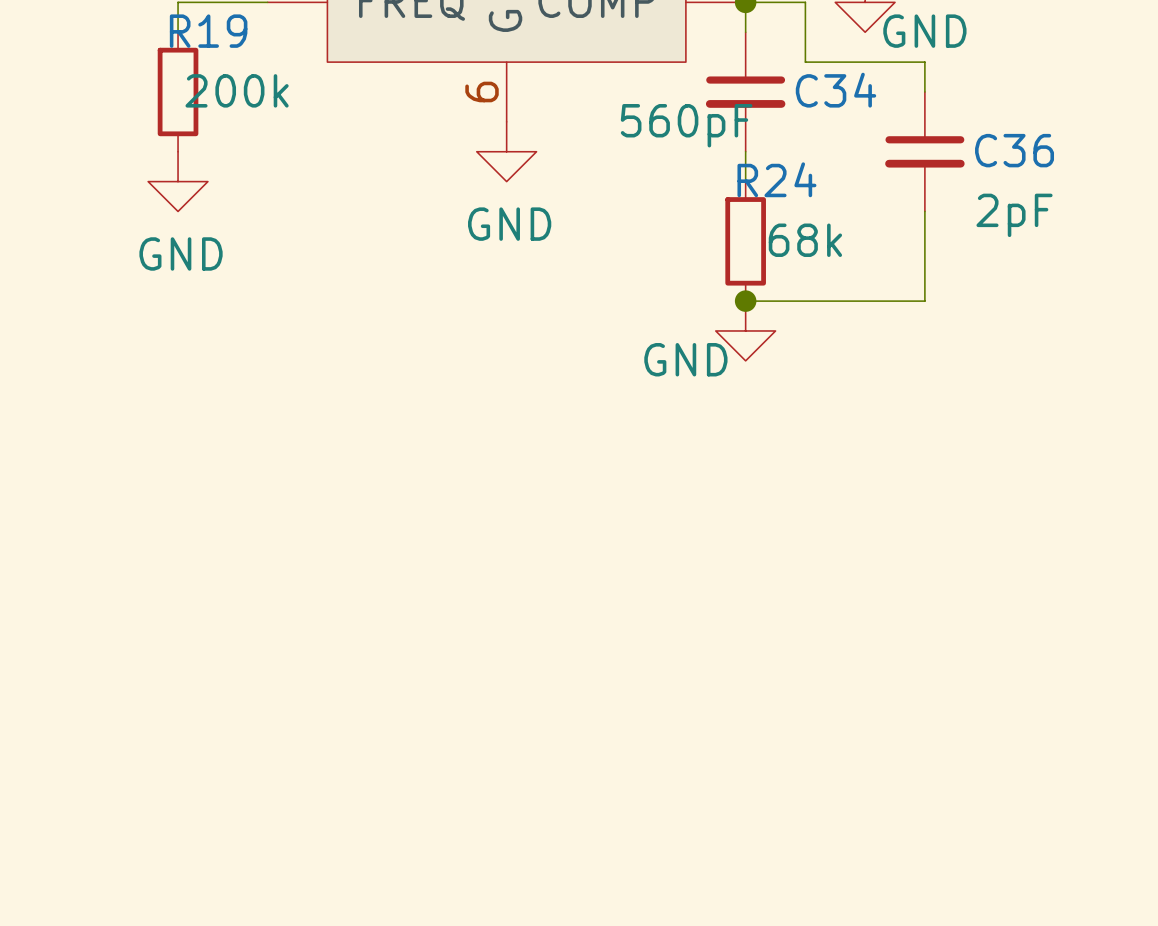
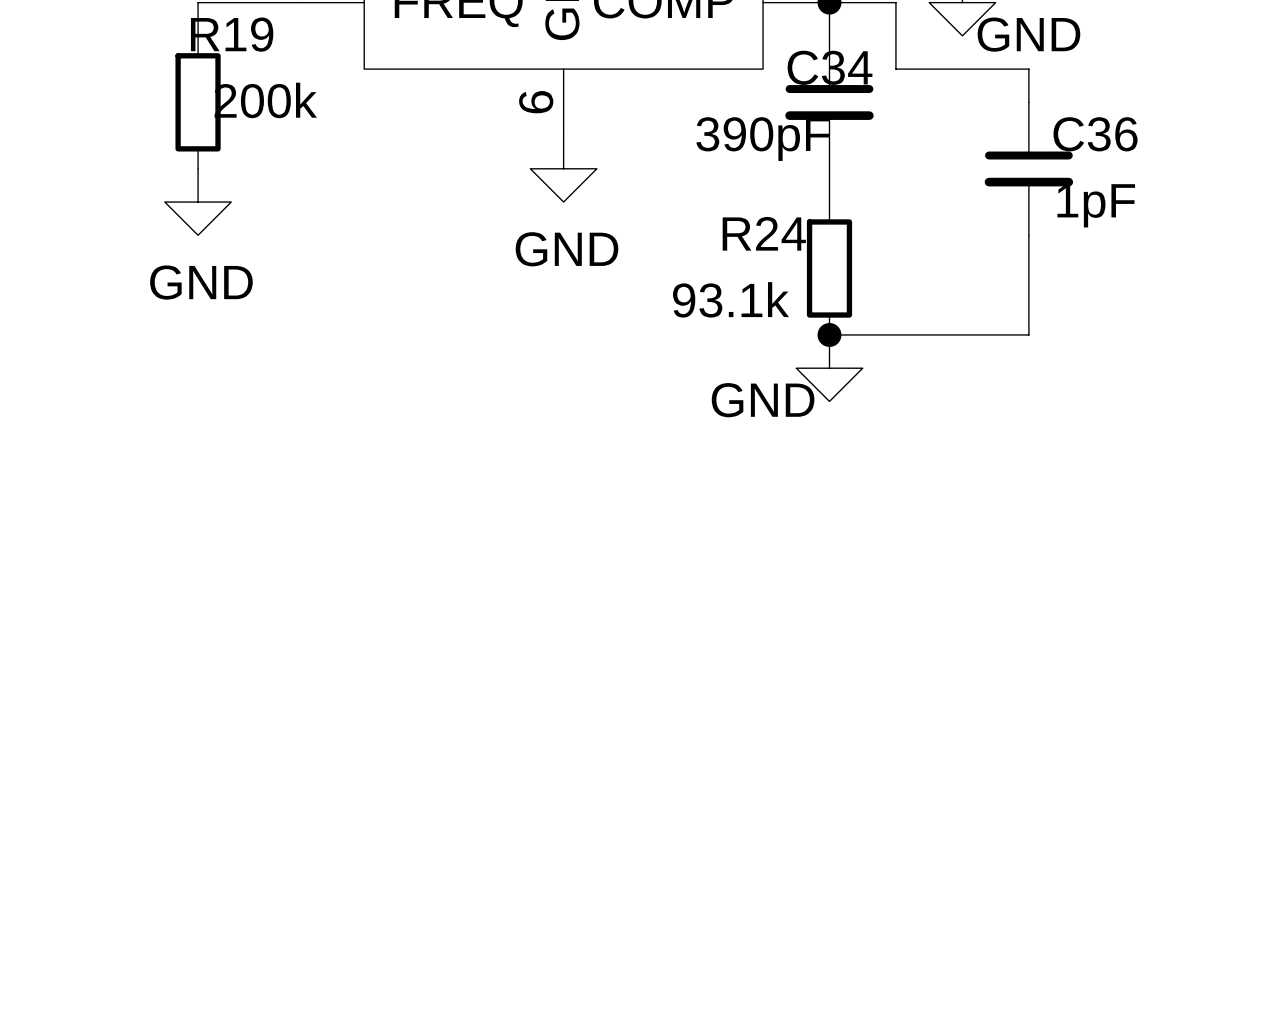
C34 name position: C34 (835, 90) -> C34 (830, 67)
C34 value: 560pF (686, 125) -> 390pF (762, 139)
C36 name position: C36 (1014, 150) -> C36 (1095, 134)
R24 name position: R24 (776, 179) -> R24 (764, 233)
C36 value: 2pF (1014, 215) -> 1pF (1096, 205)
R24 value: 68k (805, 240) -> 93.1k (730, 299)

